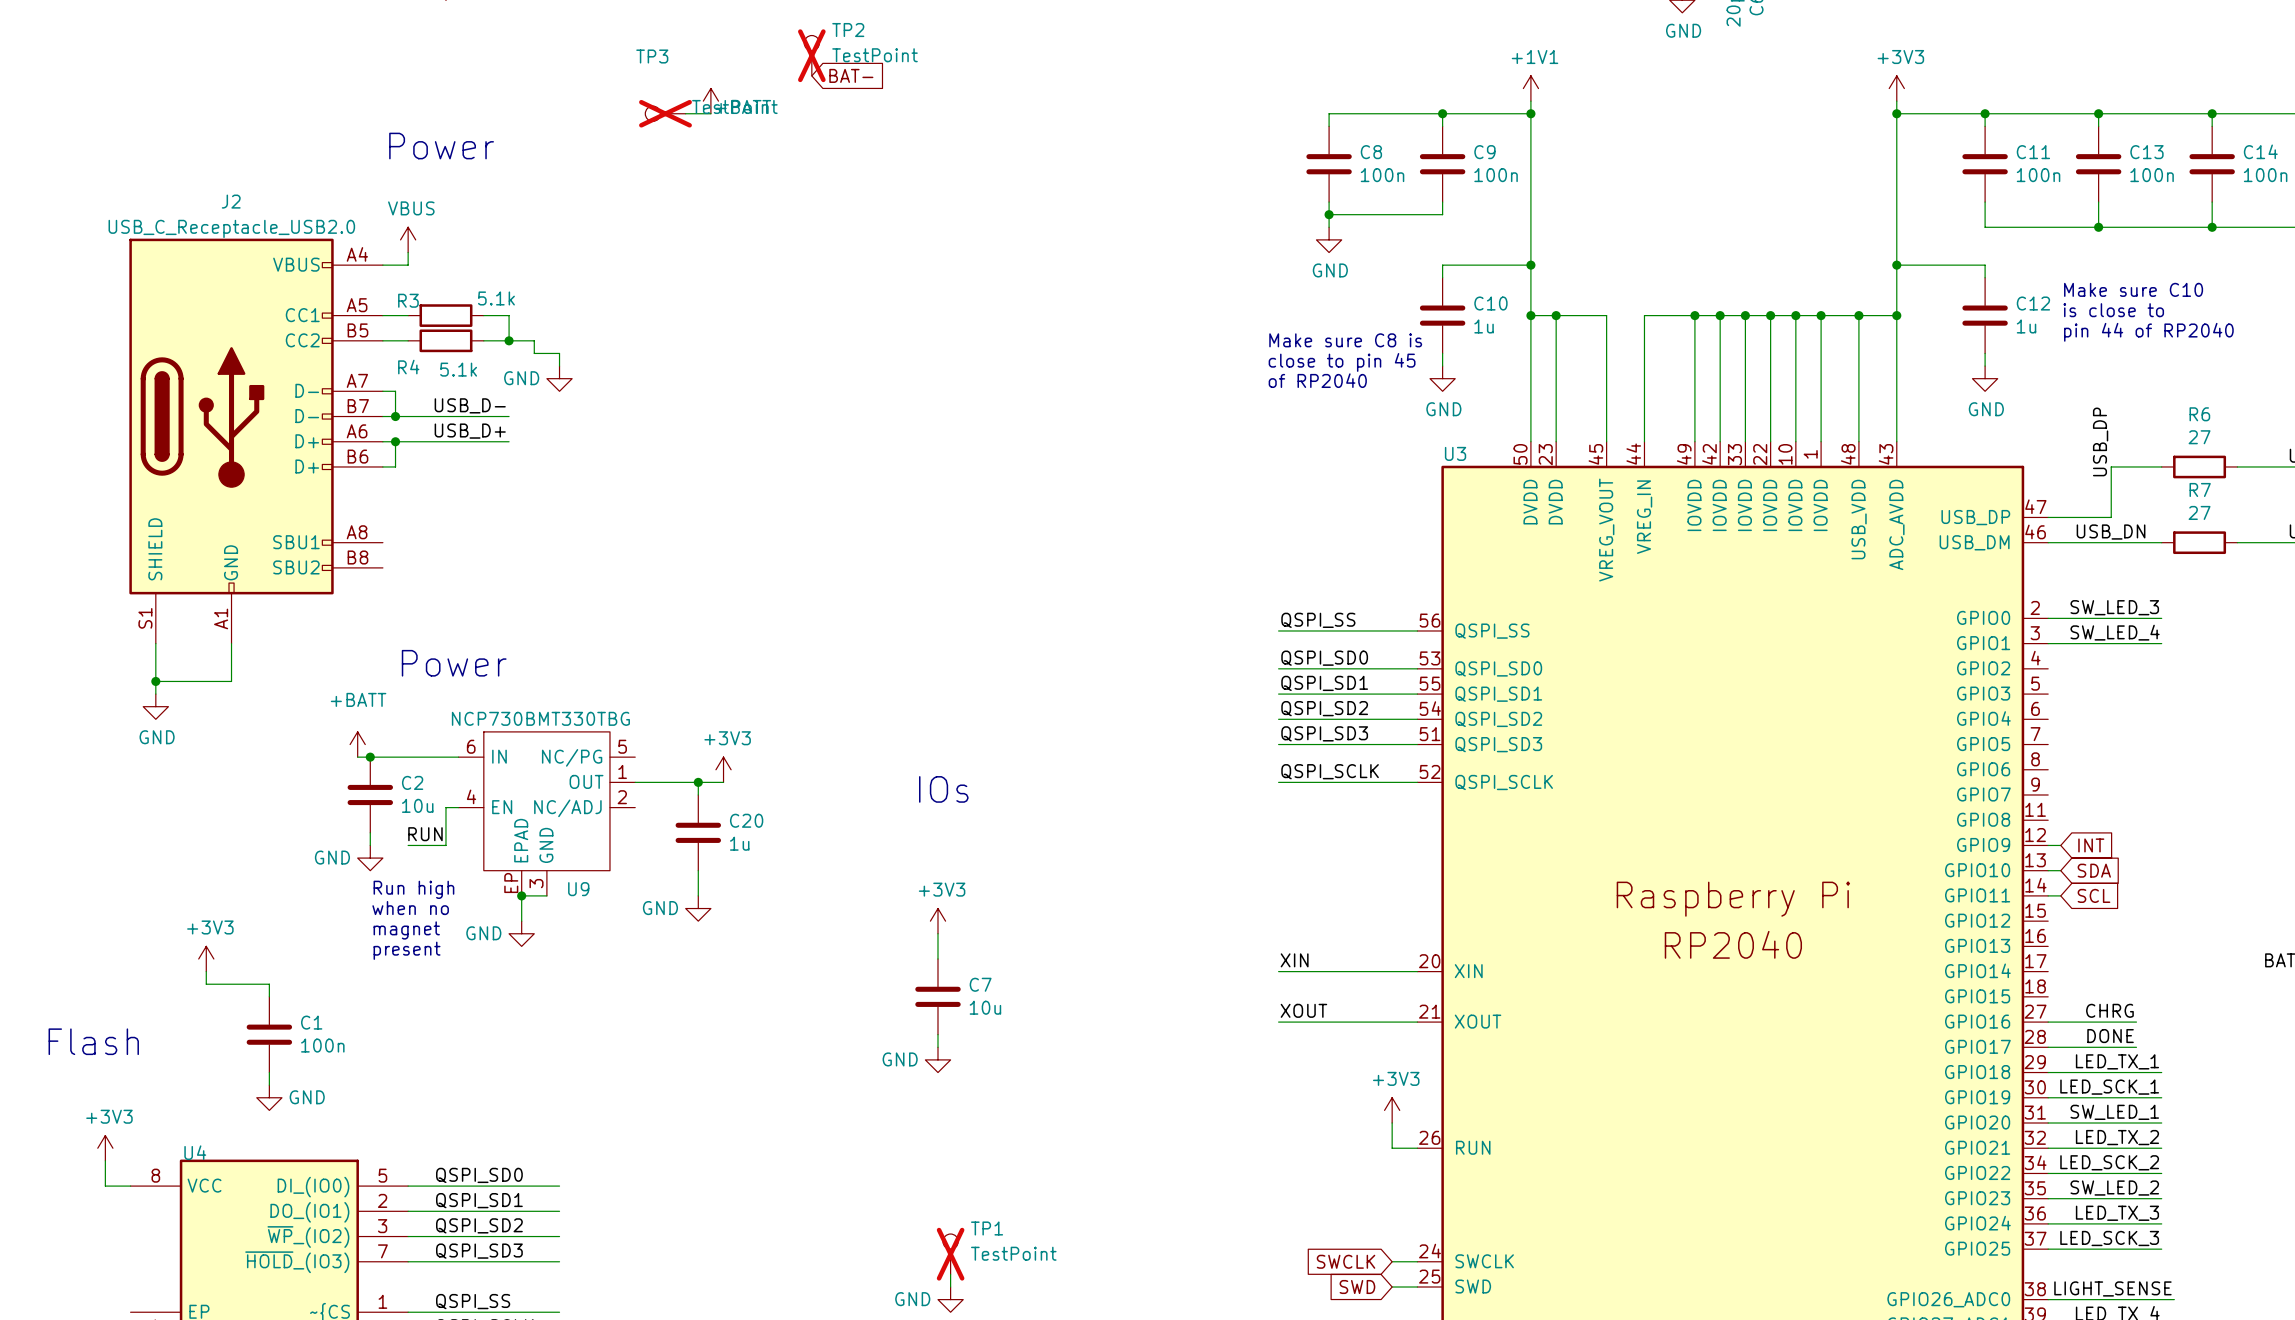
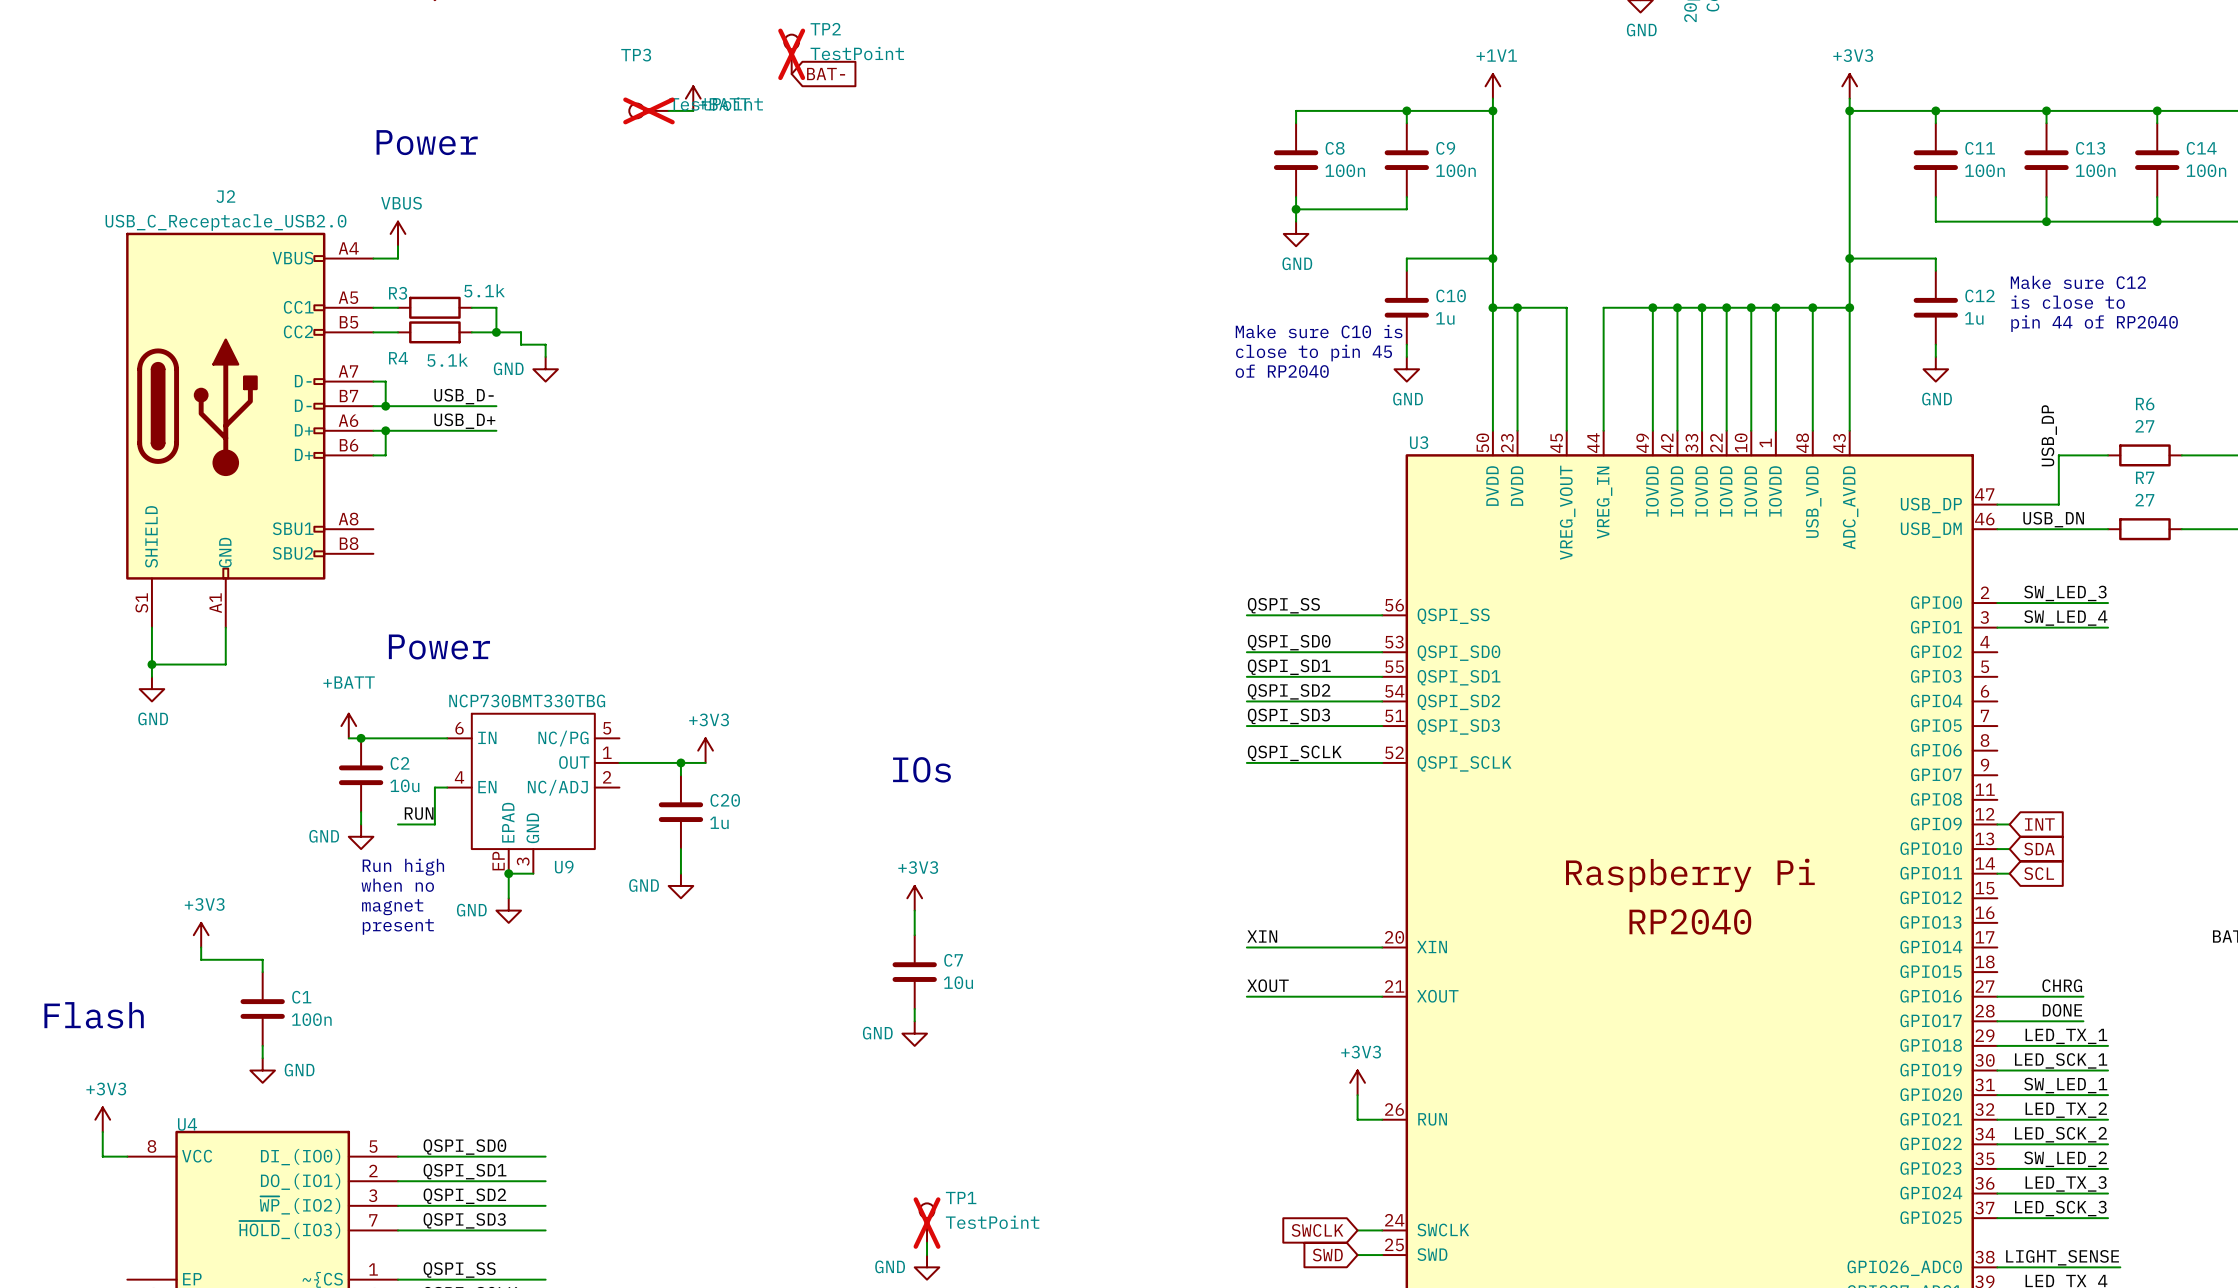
text: Make sure C10 (2133, 289) -> Make sure C12 (2078, 282)
text: Make sure C8 is (1345, 340) -> Make sure C10 is (1319, 331)

